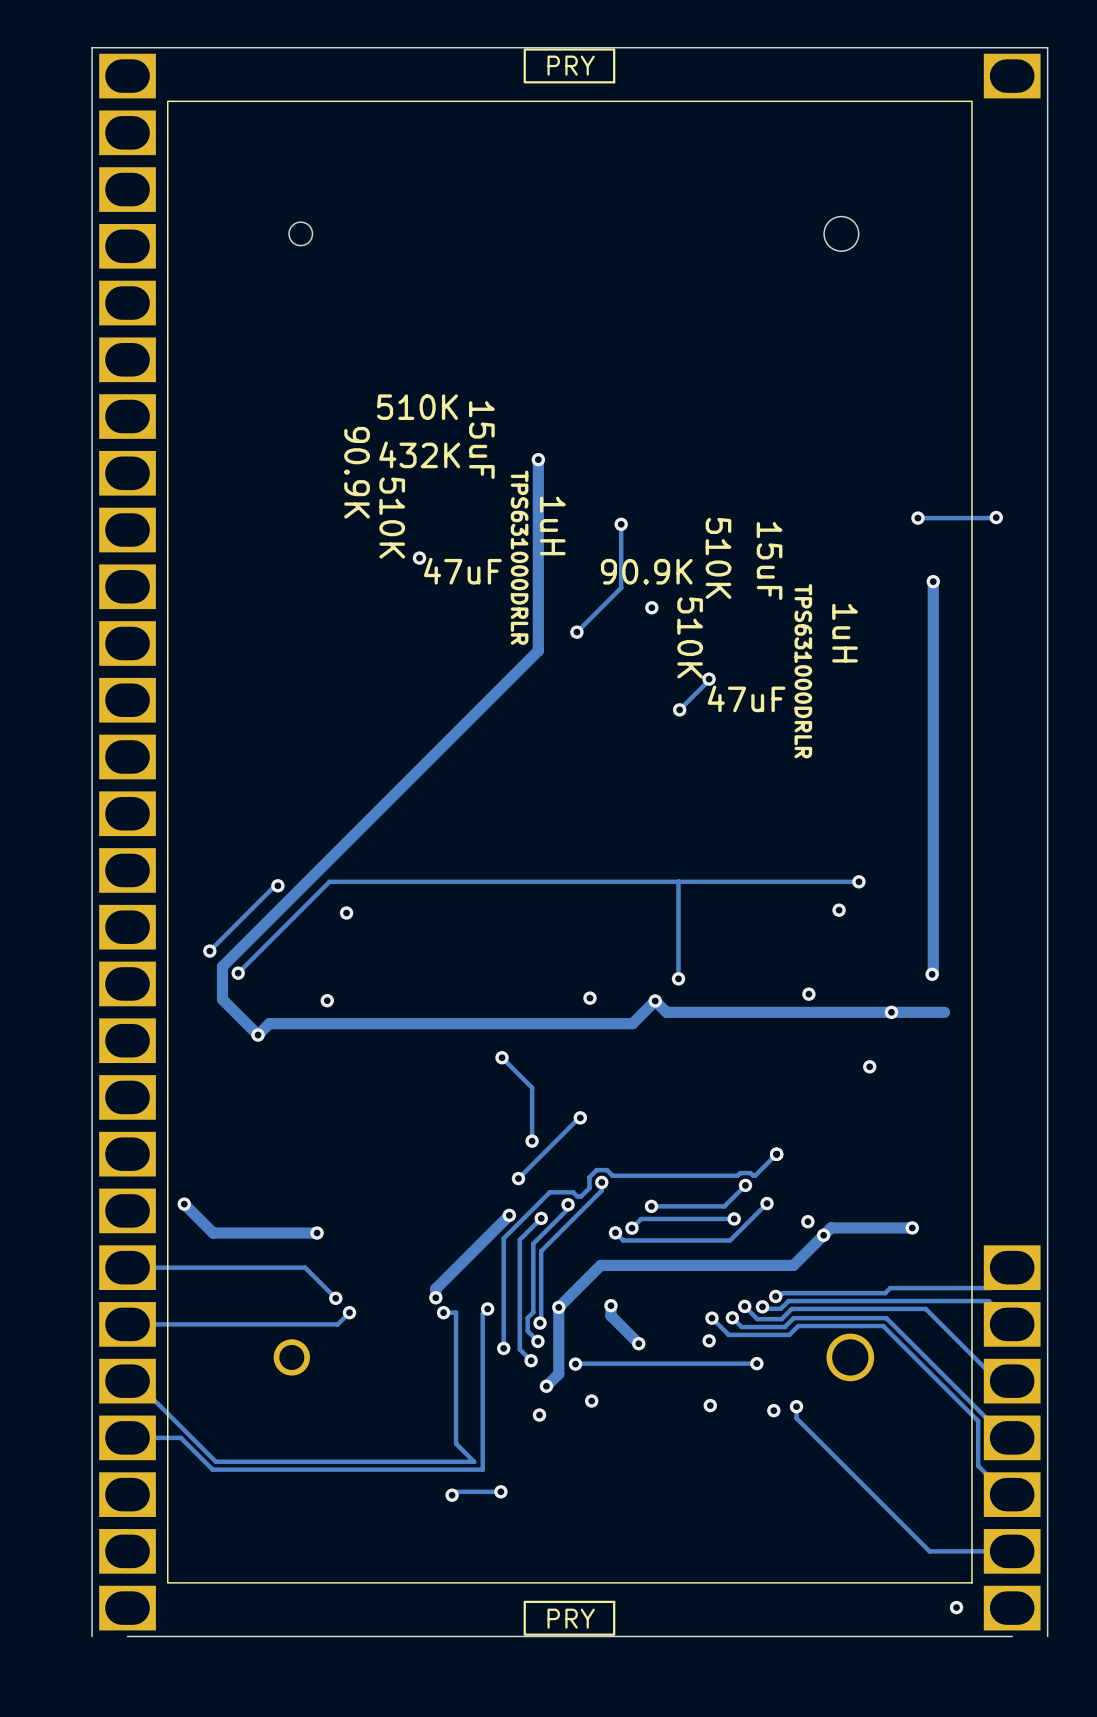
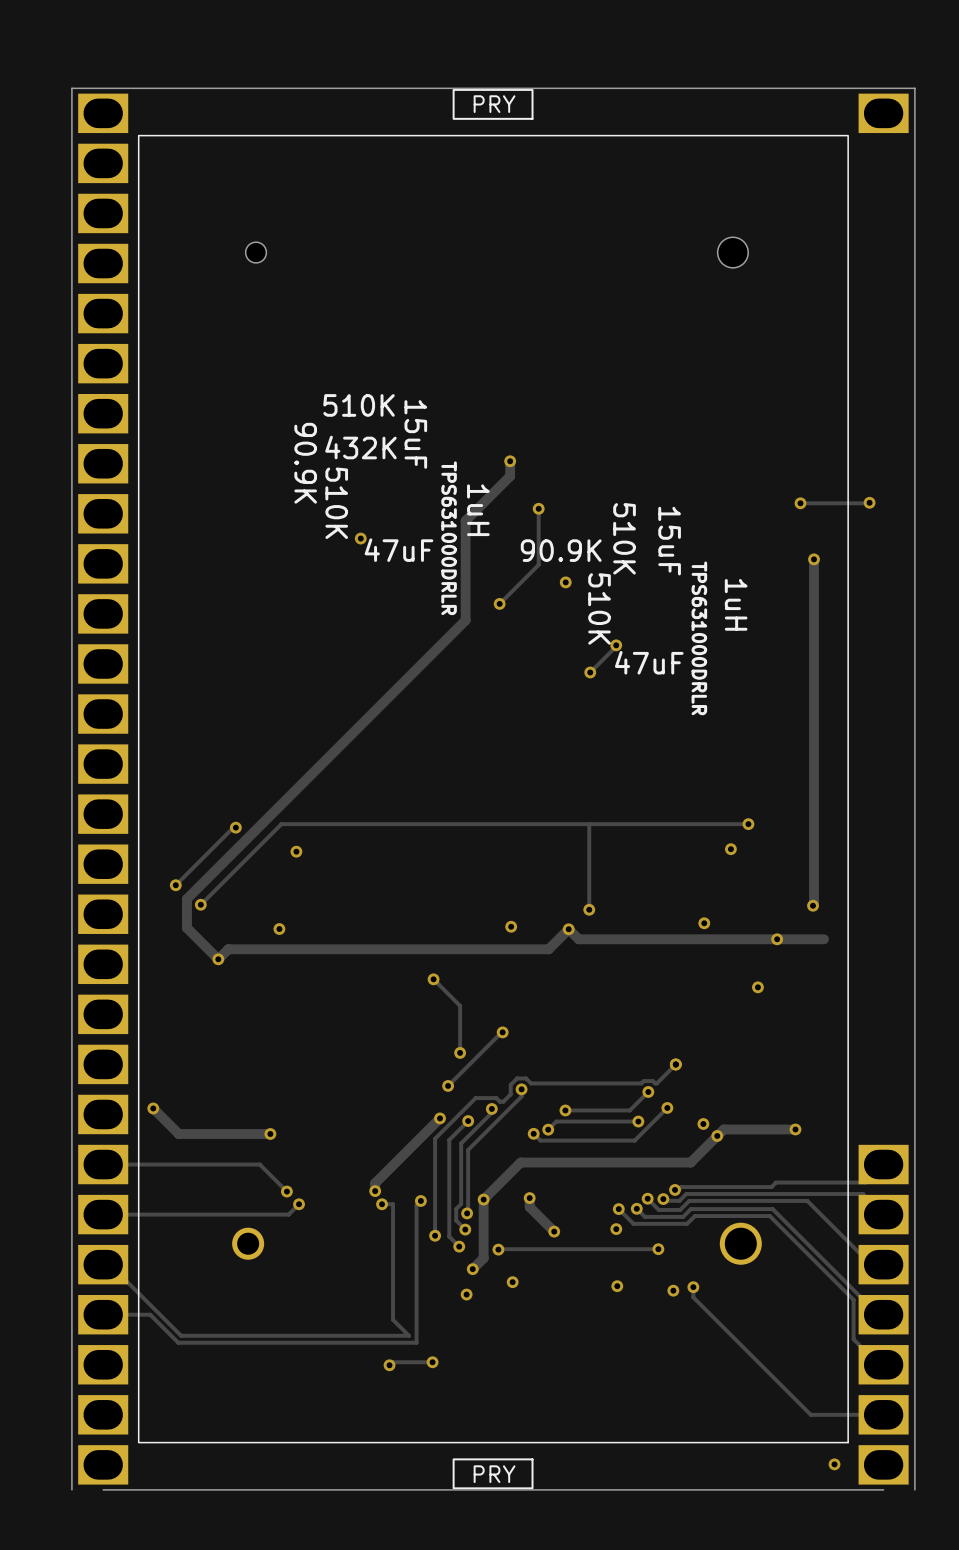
track: (538, 459) (538, 537) -> (510, 461) (510, 476) (465, 520)
via position: (538, 459) -> (510, 461)

